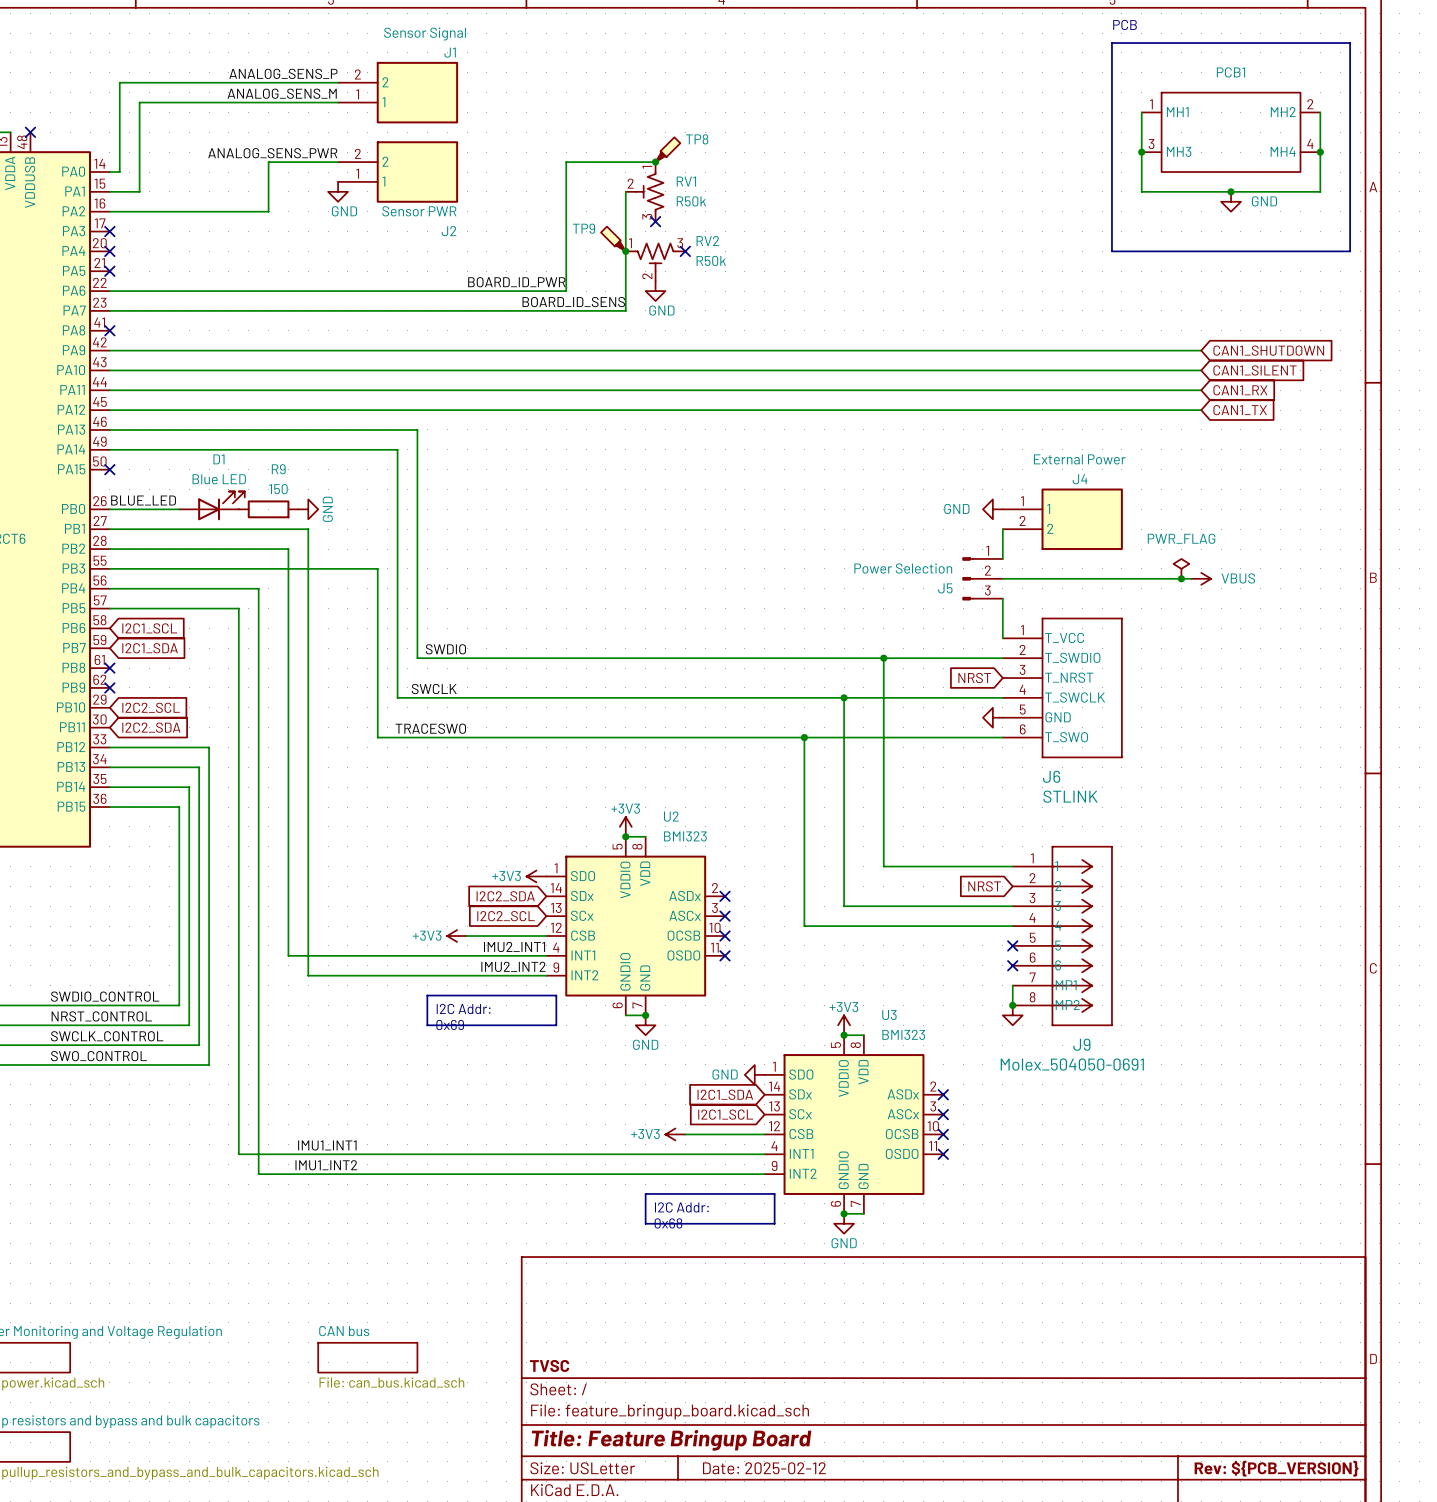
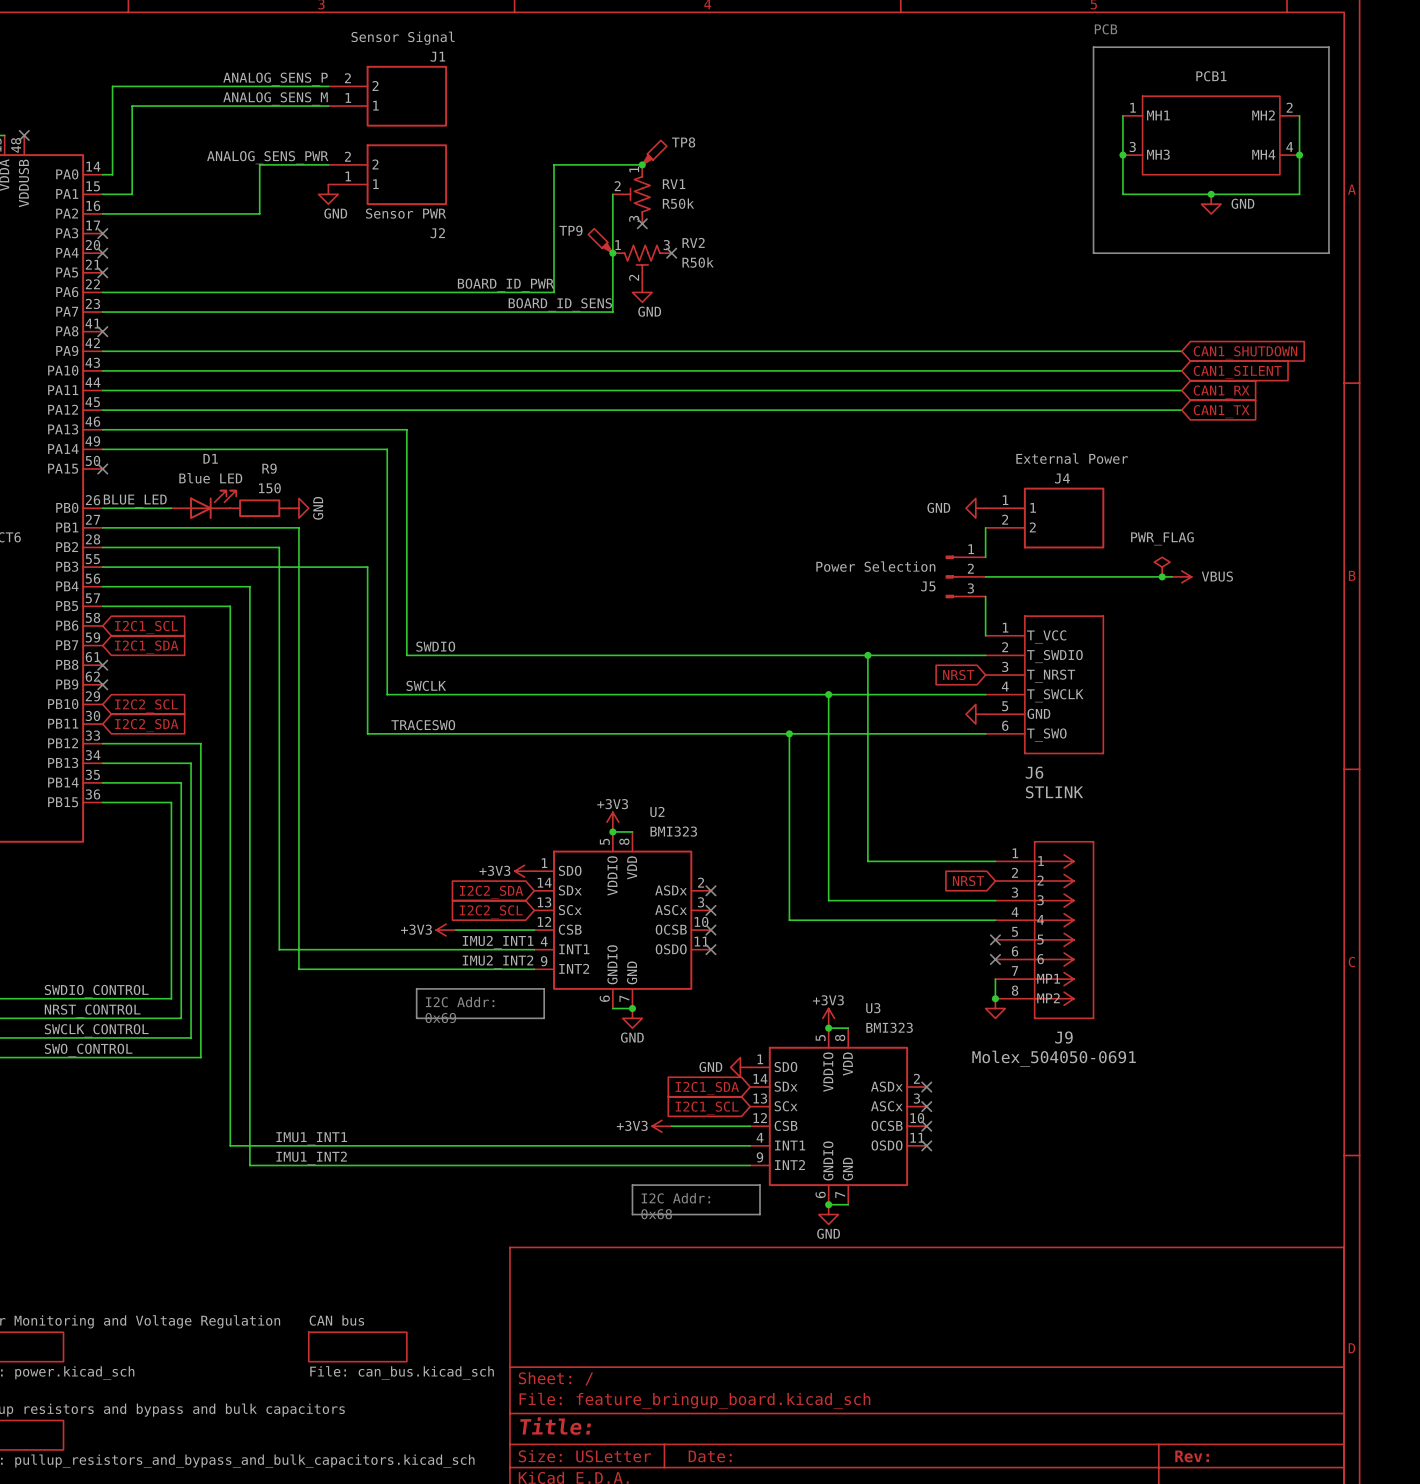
title block: TVSC (549, 1365) -> none
title block: Title: Feature Bringup Board (671, 1440) -> Title: (555, 1426)
title block: Date: 2025-02-12 (764, 1468) -> Date: (710, 1456)
title block: Rev: ${PCB_VERSION} (1276, 1468) -> Rev: (1192, 1456)

